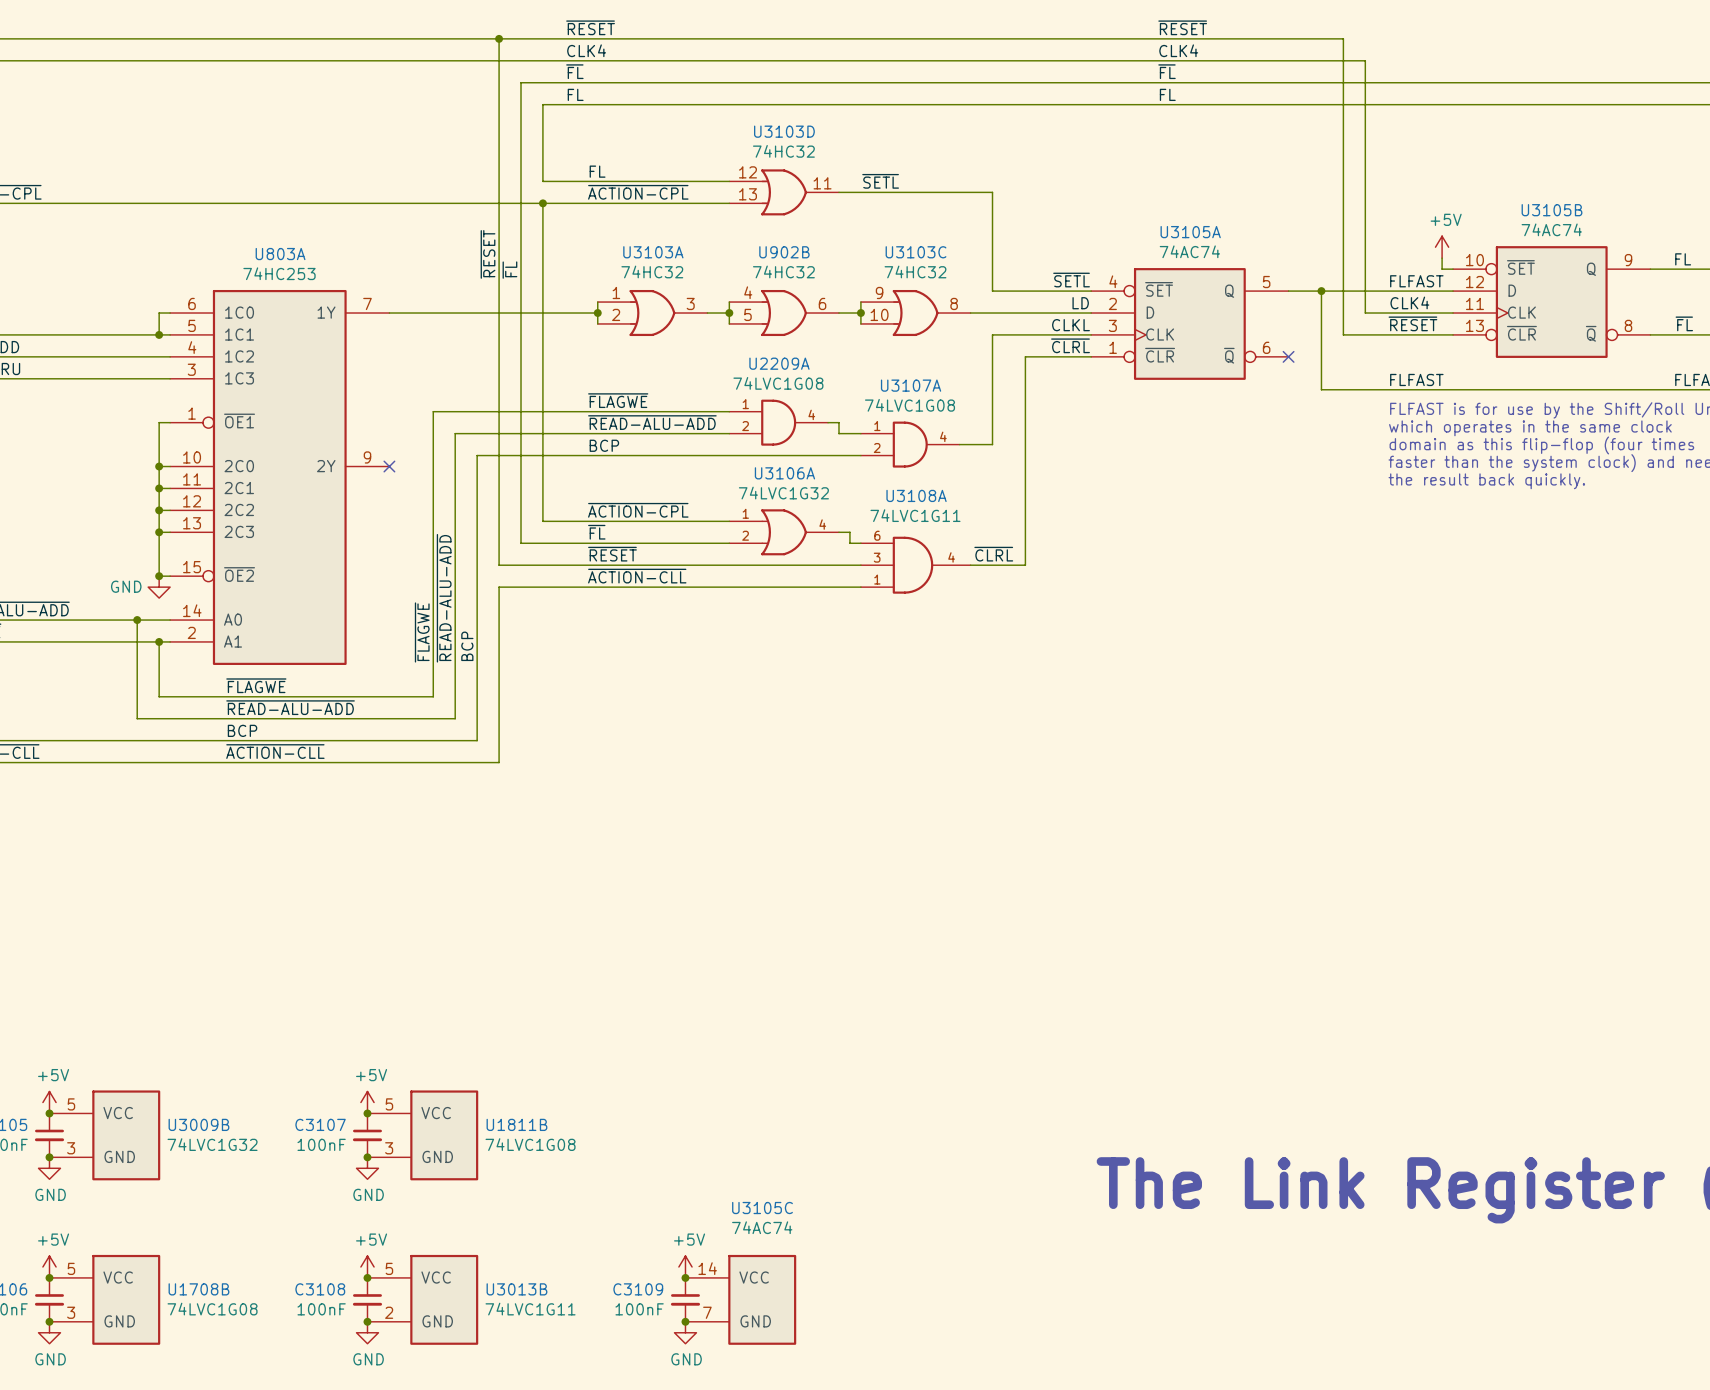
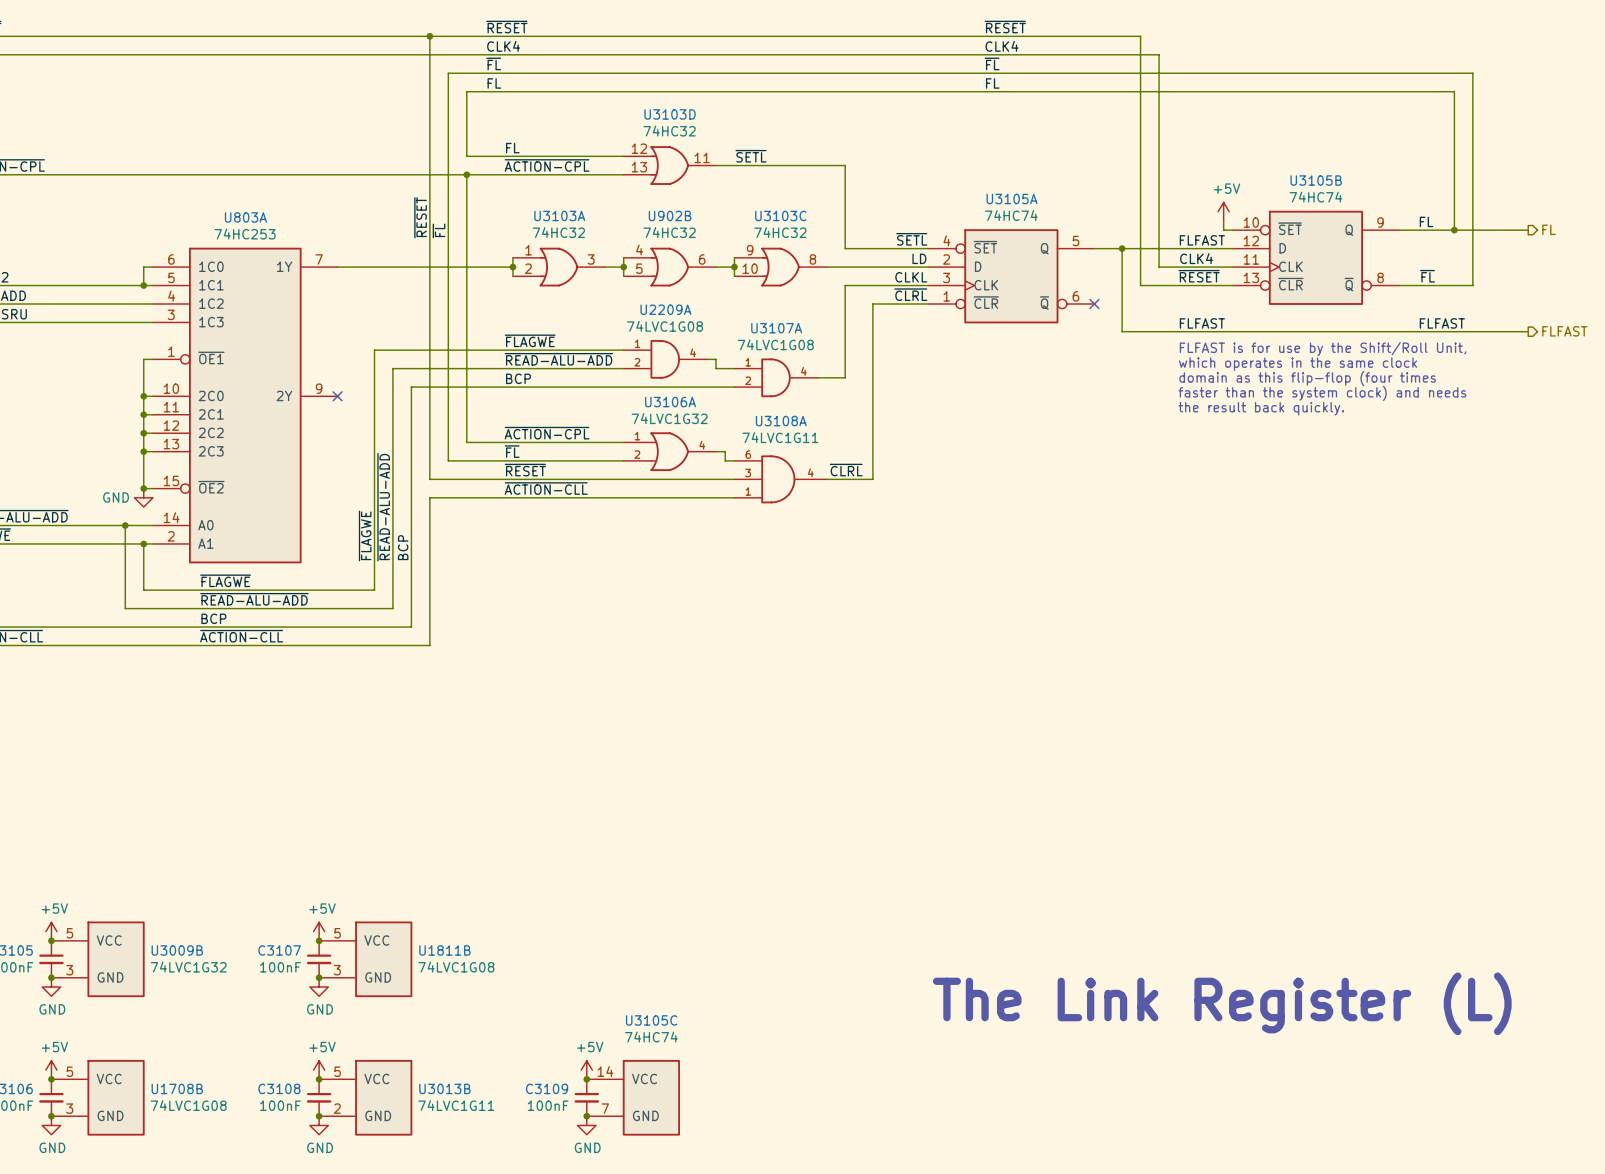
U3105B value: 74AC74 (1551, 229) -> 74HC74 (1315, 197)
U3105A value: 74AC74 (1189, 251) -> 74HC74 (1011, 215)
U3105C value: 74AC74 (762, 1227) -> 74HC74 (651, 1037)

